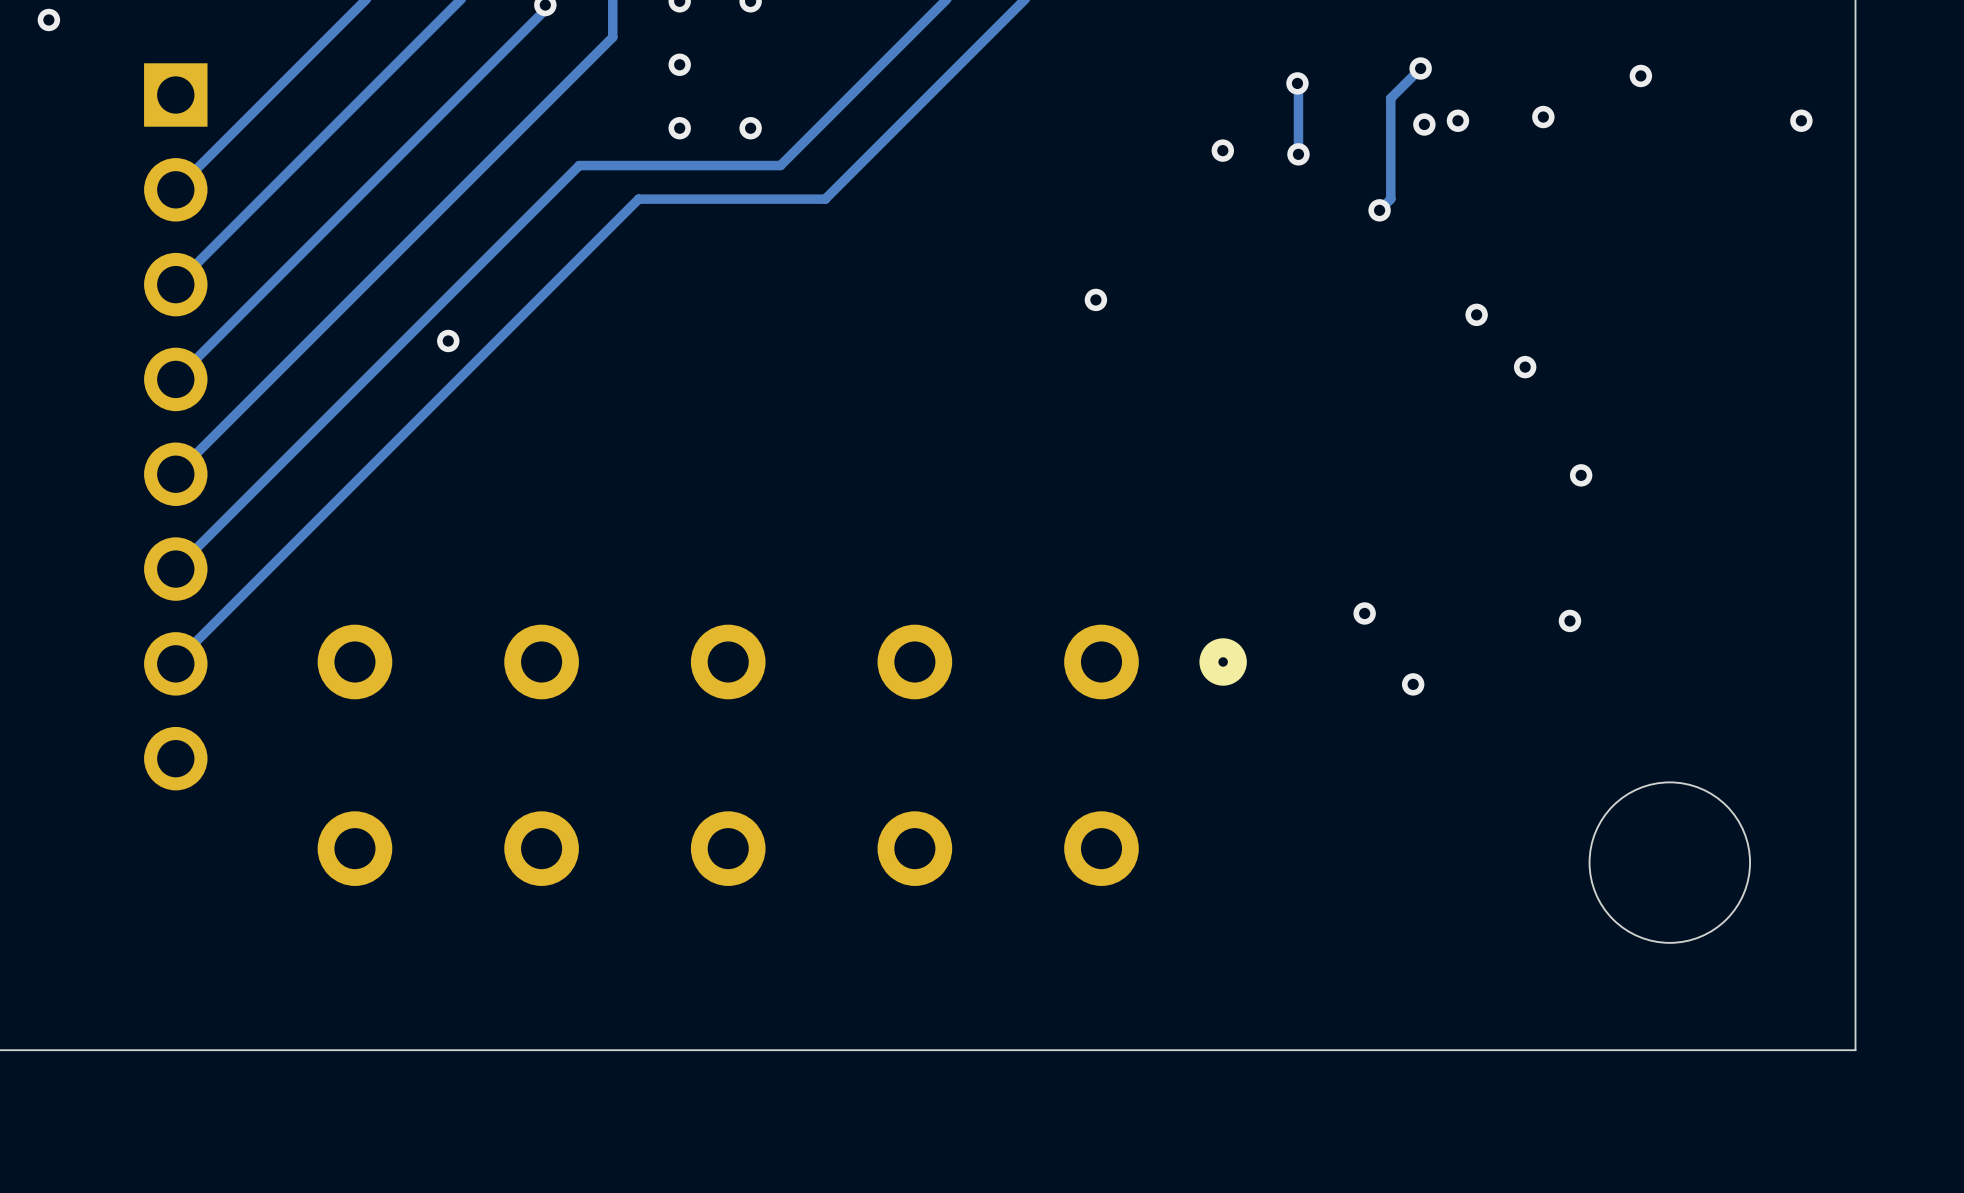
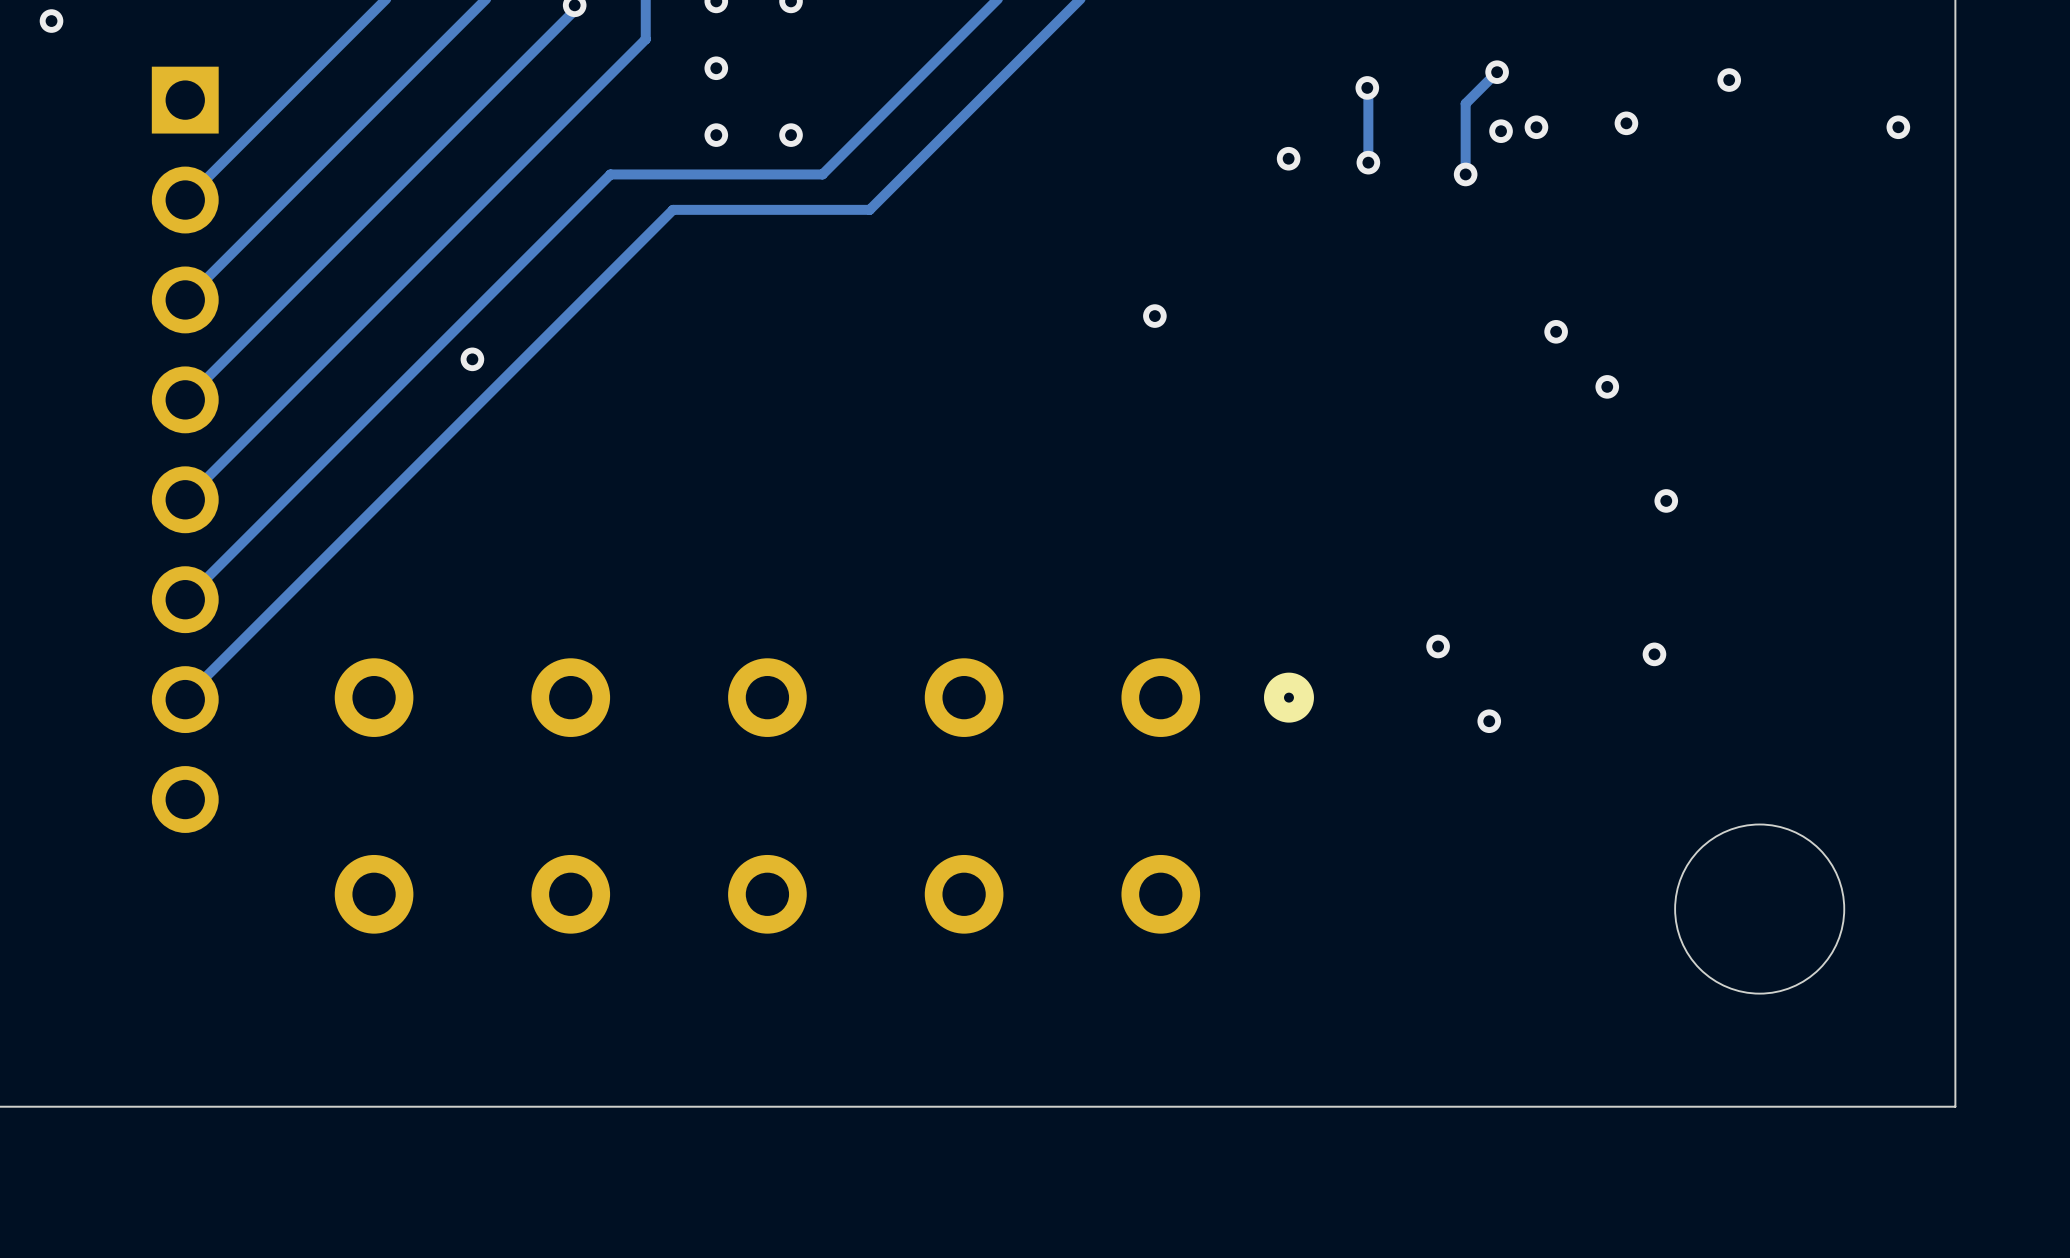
track: (1390, 165) (1390, 199) (1379, 210) -> none
via position: (1379, 210) -> (1465, 174)

